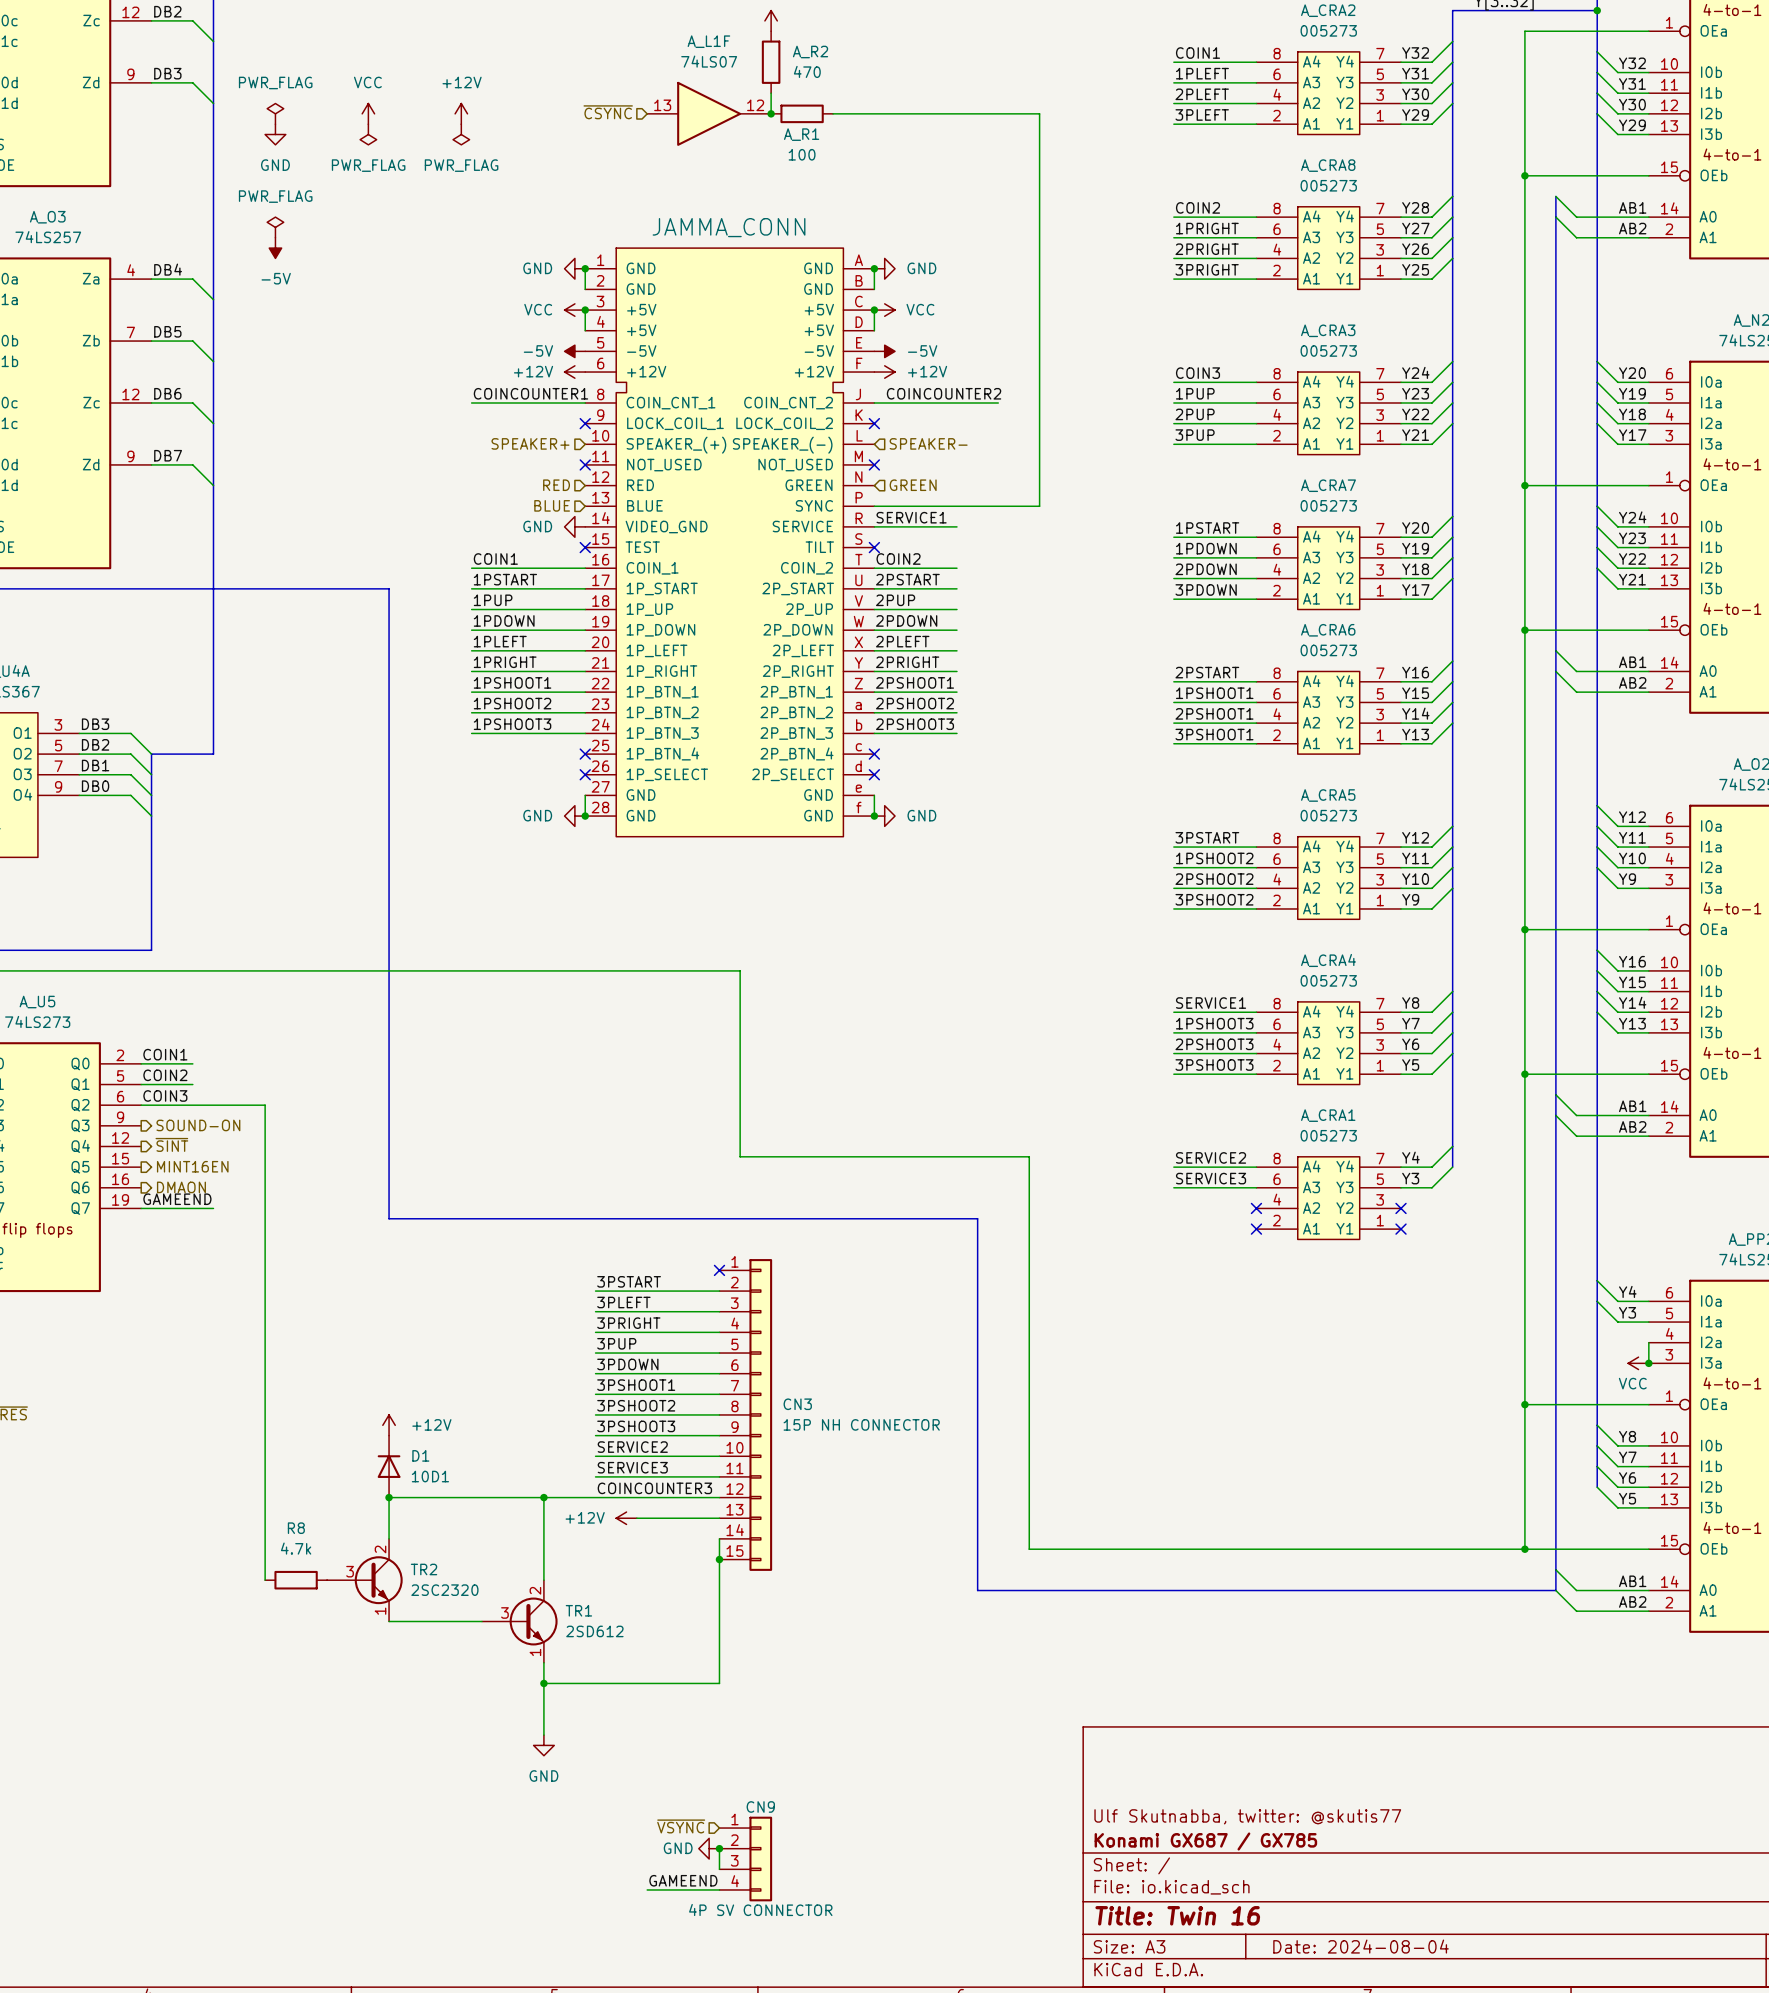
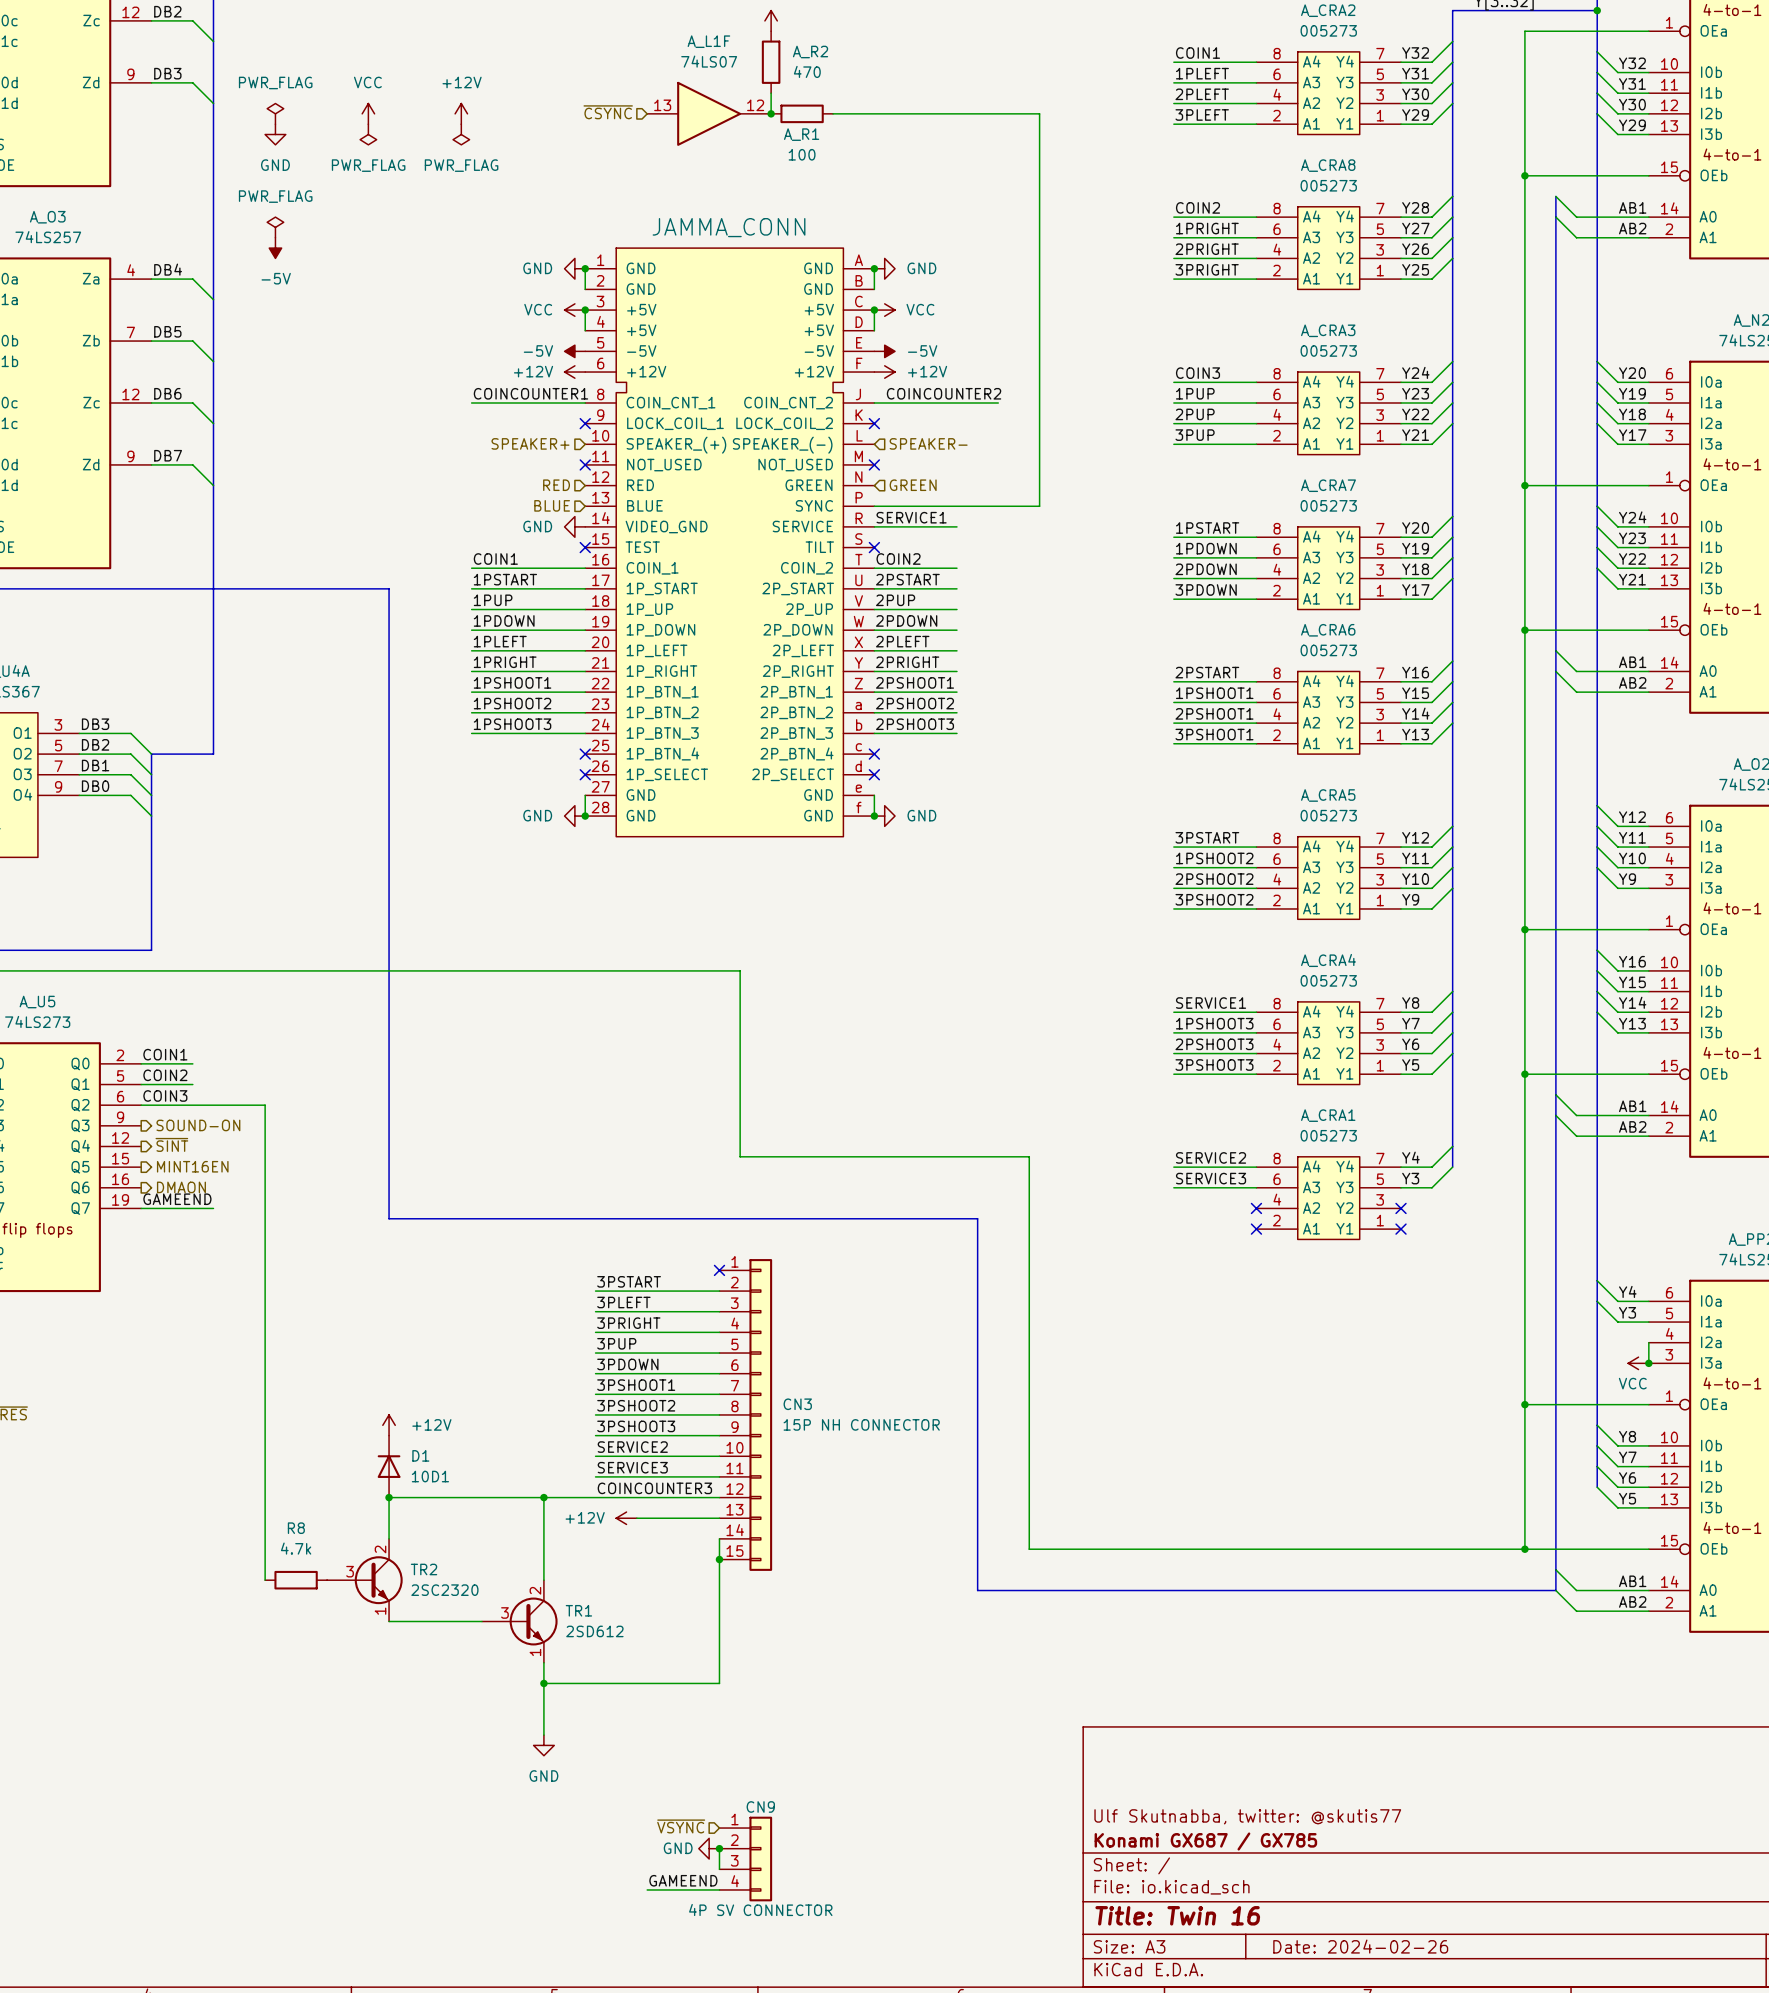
title block: Date: 2024-08-04 (1361, 1946) -> Date: 2024-02-26 (1360, 1946)

